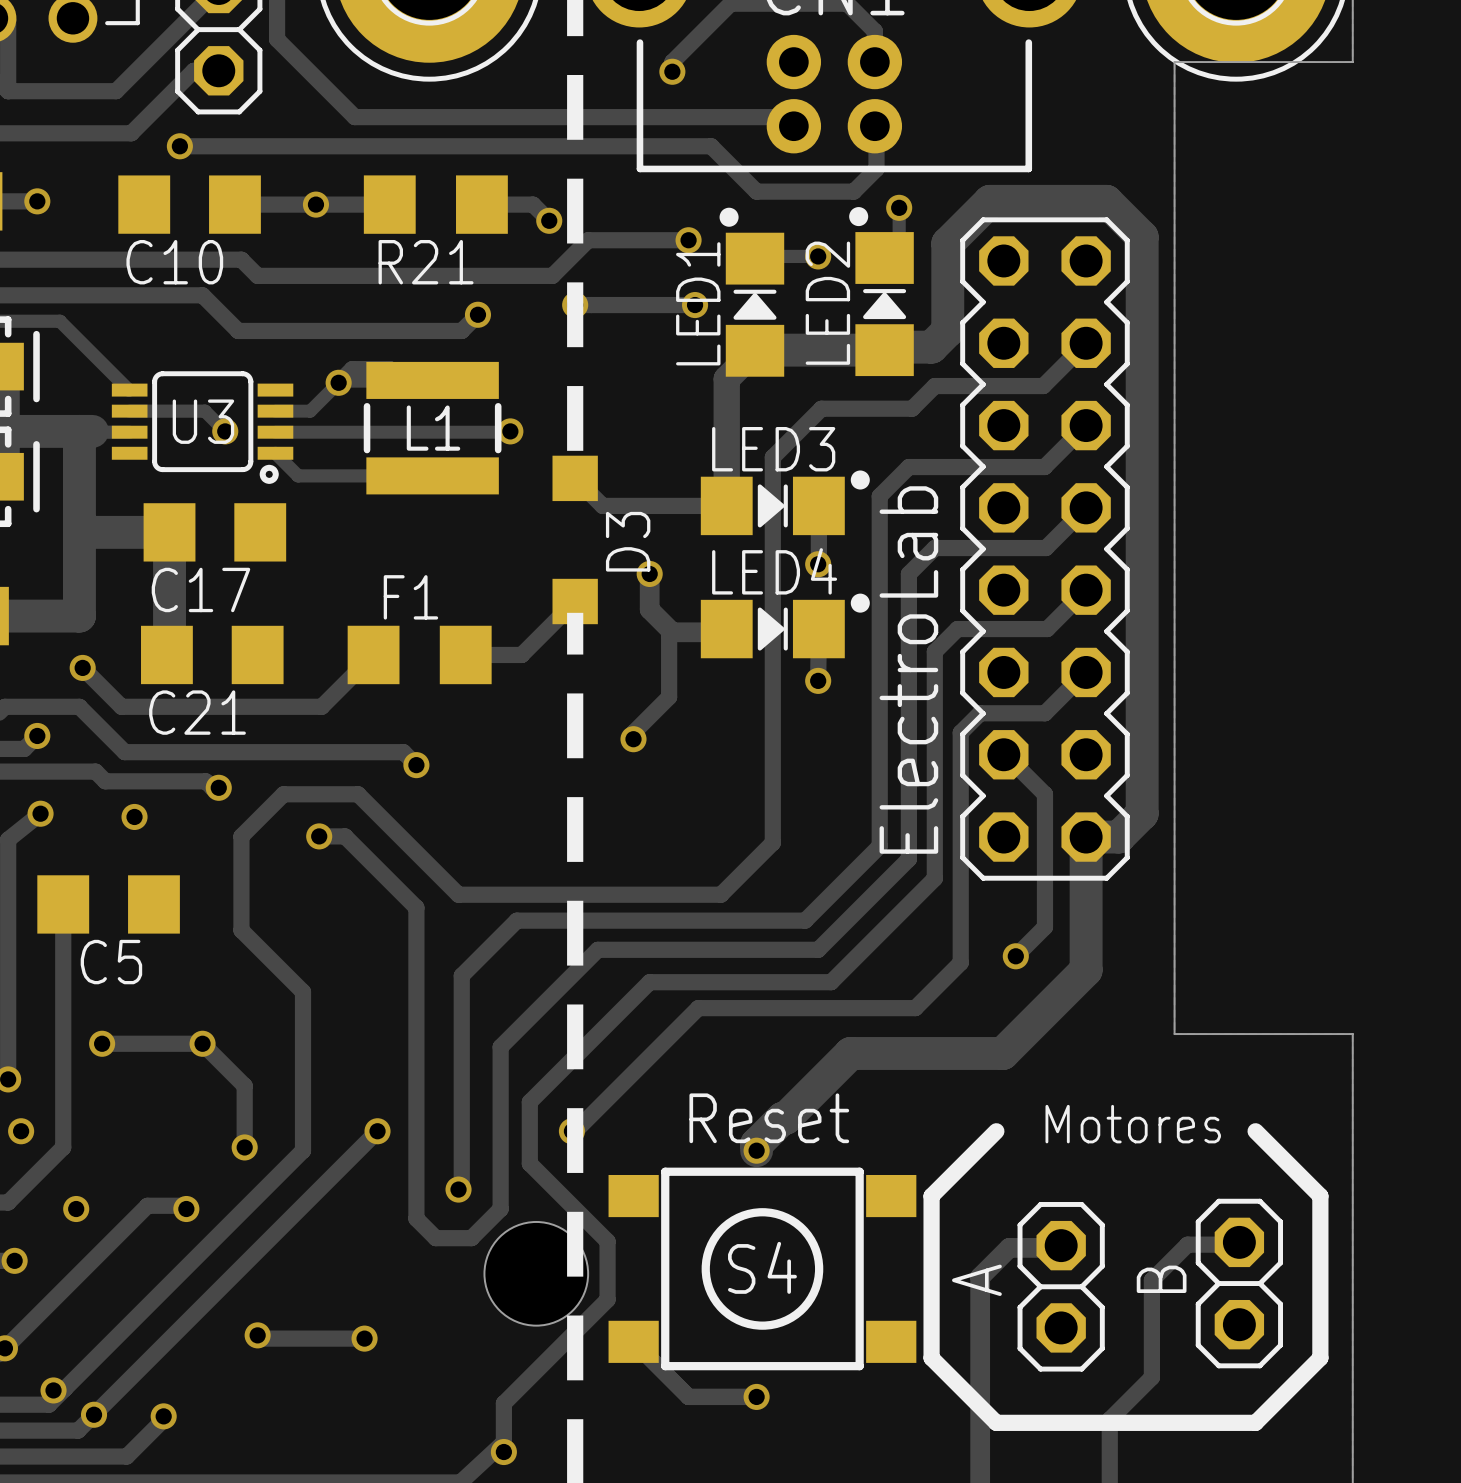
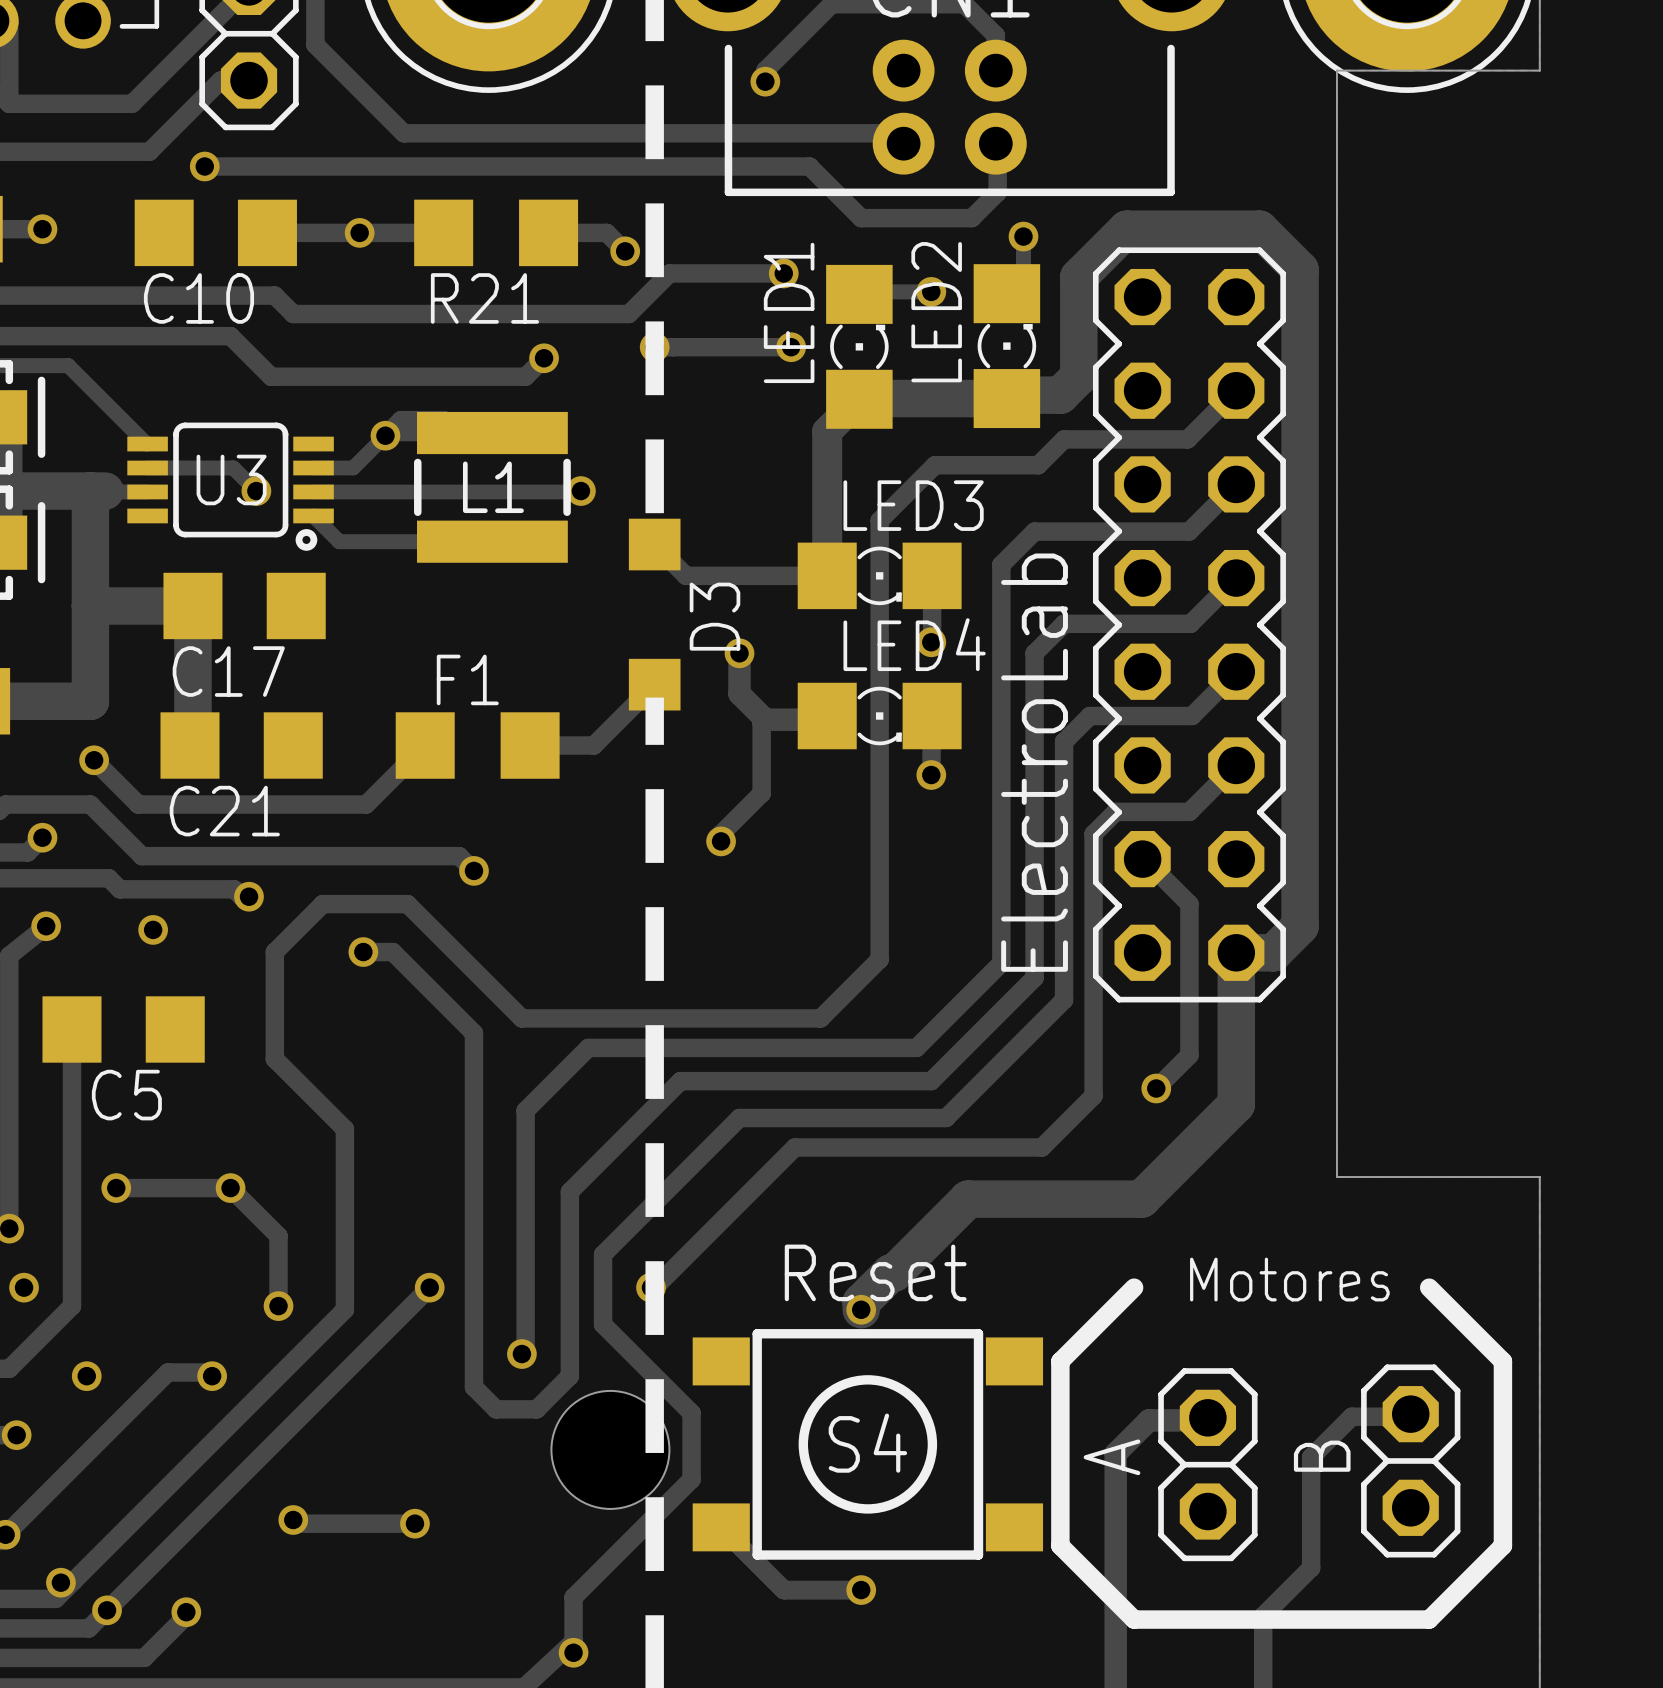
LED1 footprint: [719, 207, 785, 377] -> [826, 264, 893, 429]
LED2 footprint: [849, 207, 914, 377] -> [973, 264, 1041, 429]
LED3 footprint: [700, 470, 870, 536] -> [797, 542, 962, 610]
LED4 footprint: [700, 593, 870, 659] -> [797, 682, 962, 750]

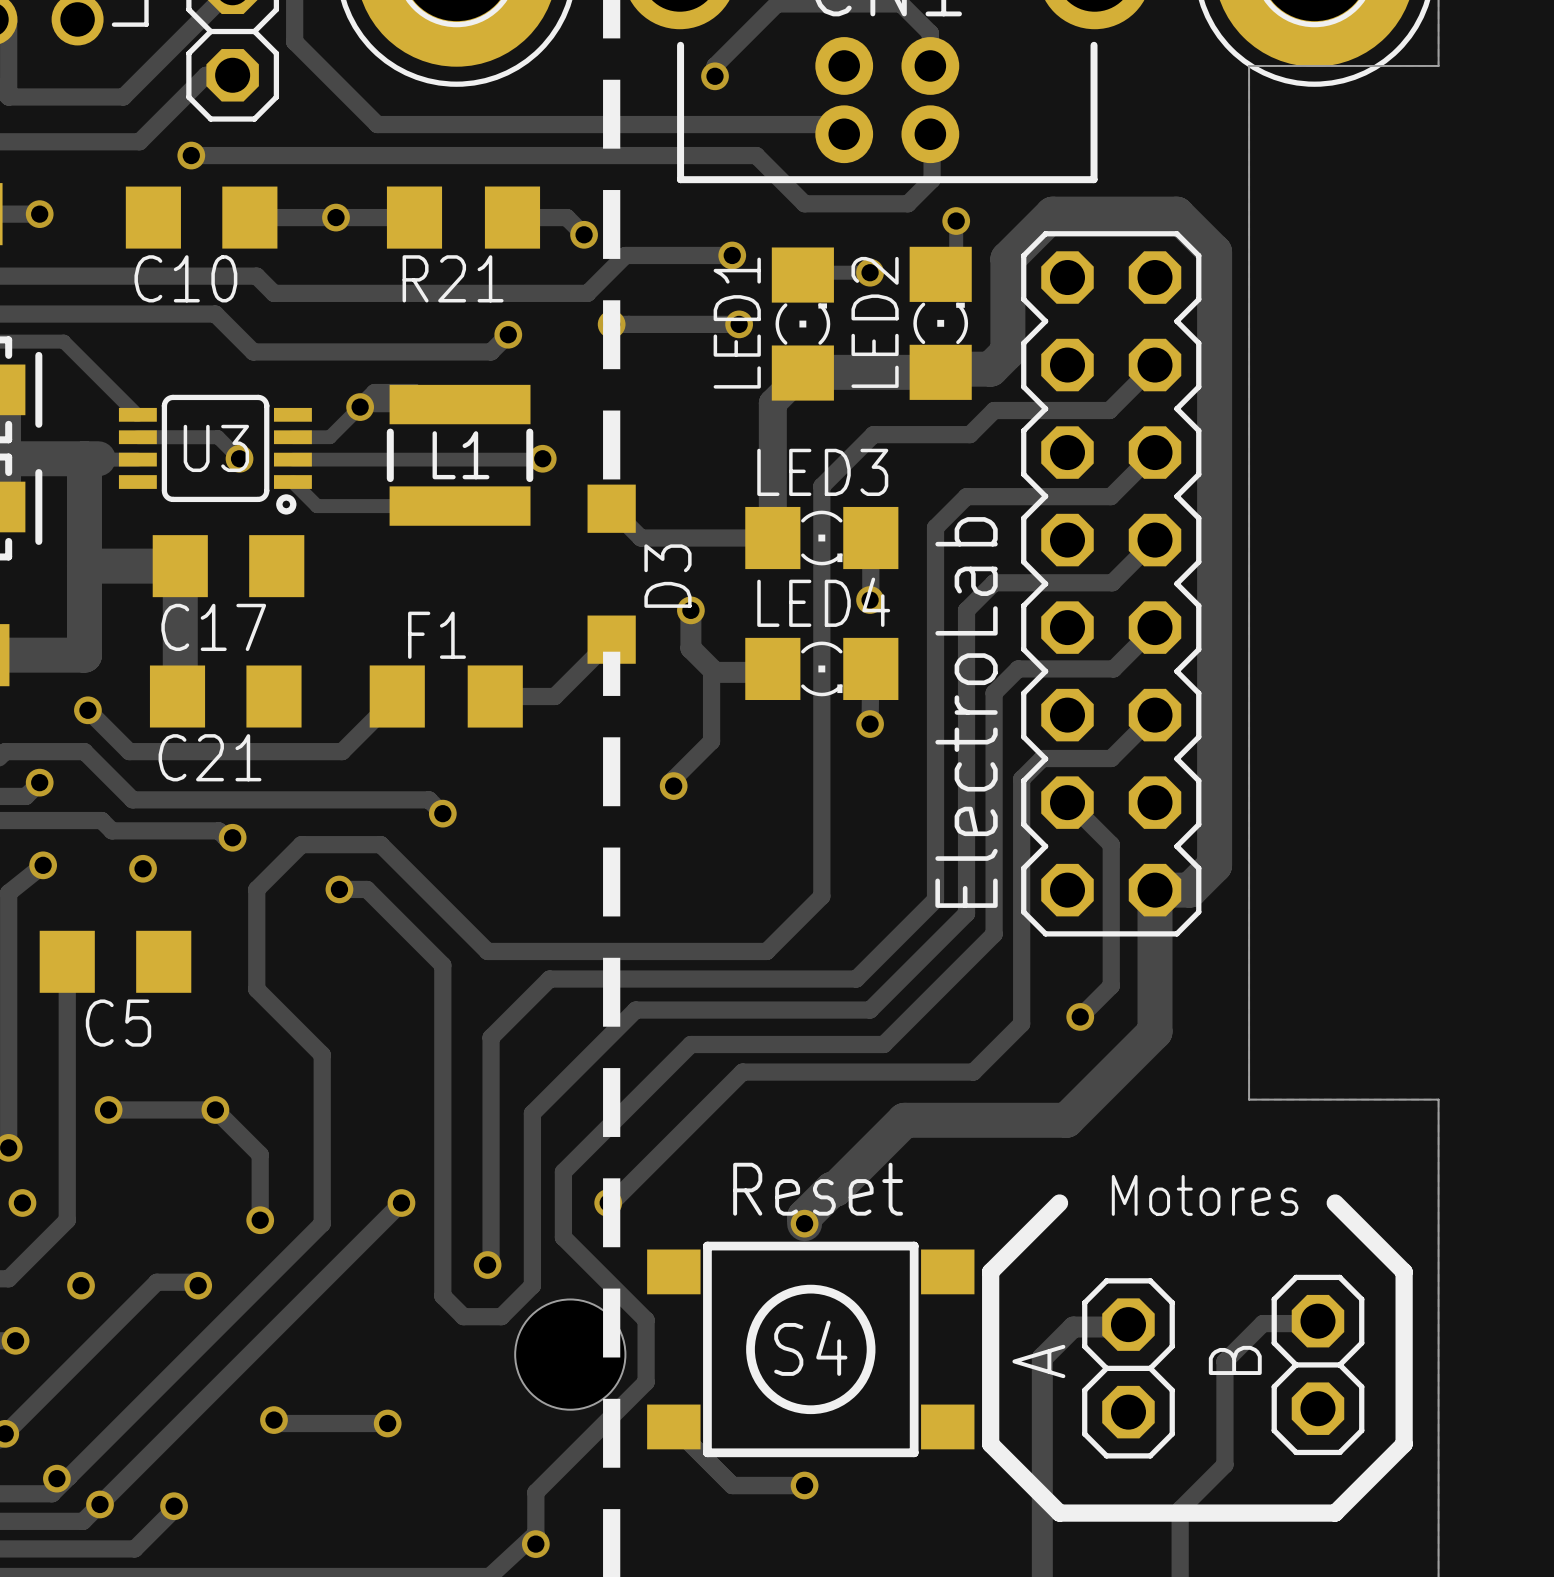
LED1 name position: LED1 (789, 312) -> LED1 (737, 323)
LED2 name position: LED2 (936, 312) -> LED2 (875, 322)
LED3 name position: LED3 (913, 505) -> LED3 (822, 472)
LED4 name position: LED4 (914, 644) -> LED4 (823, 602)

